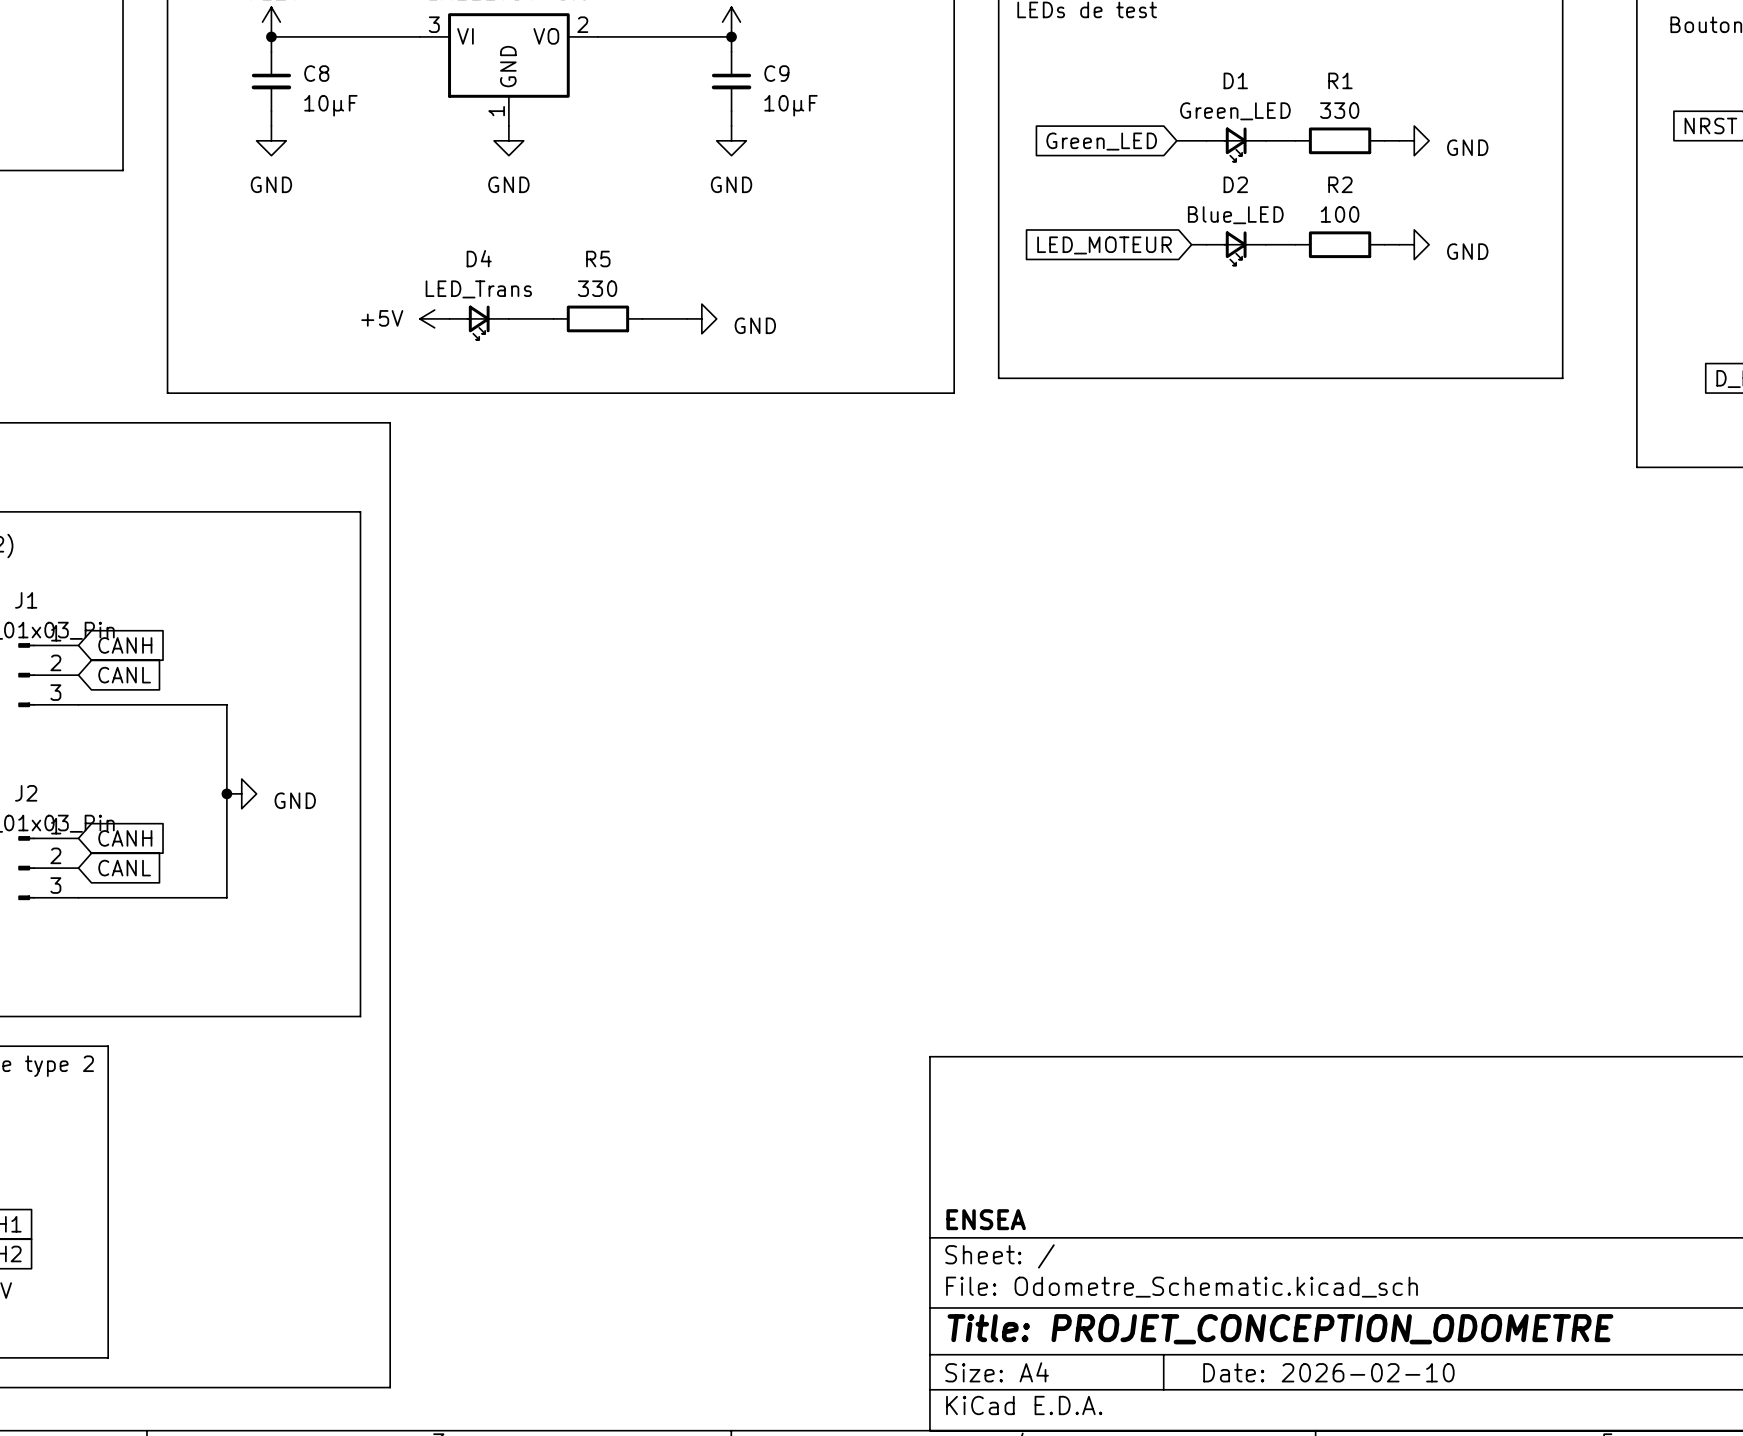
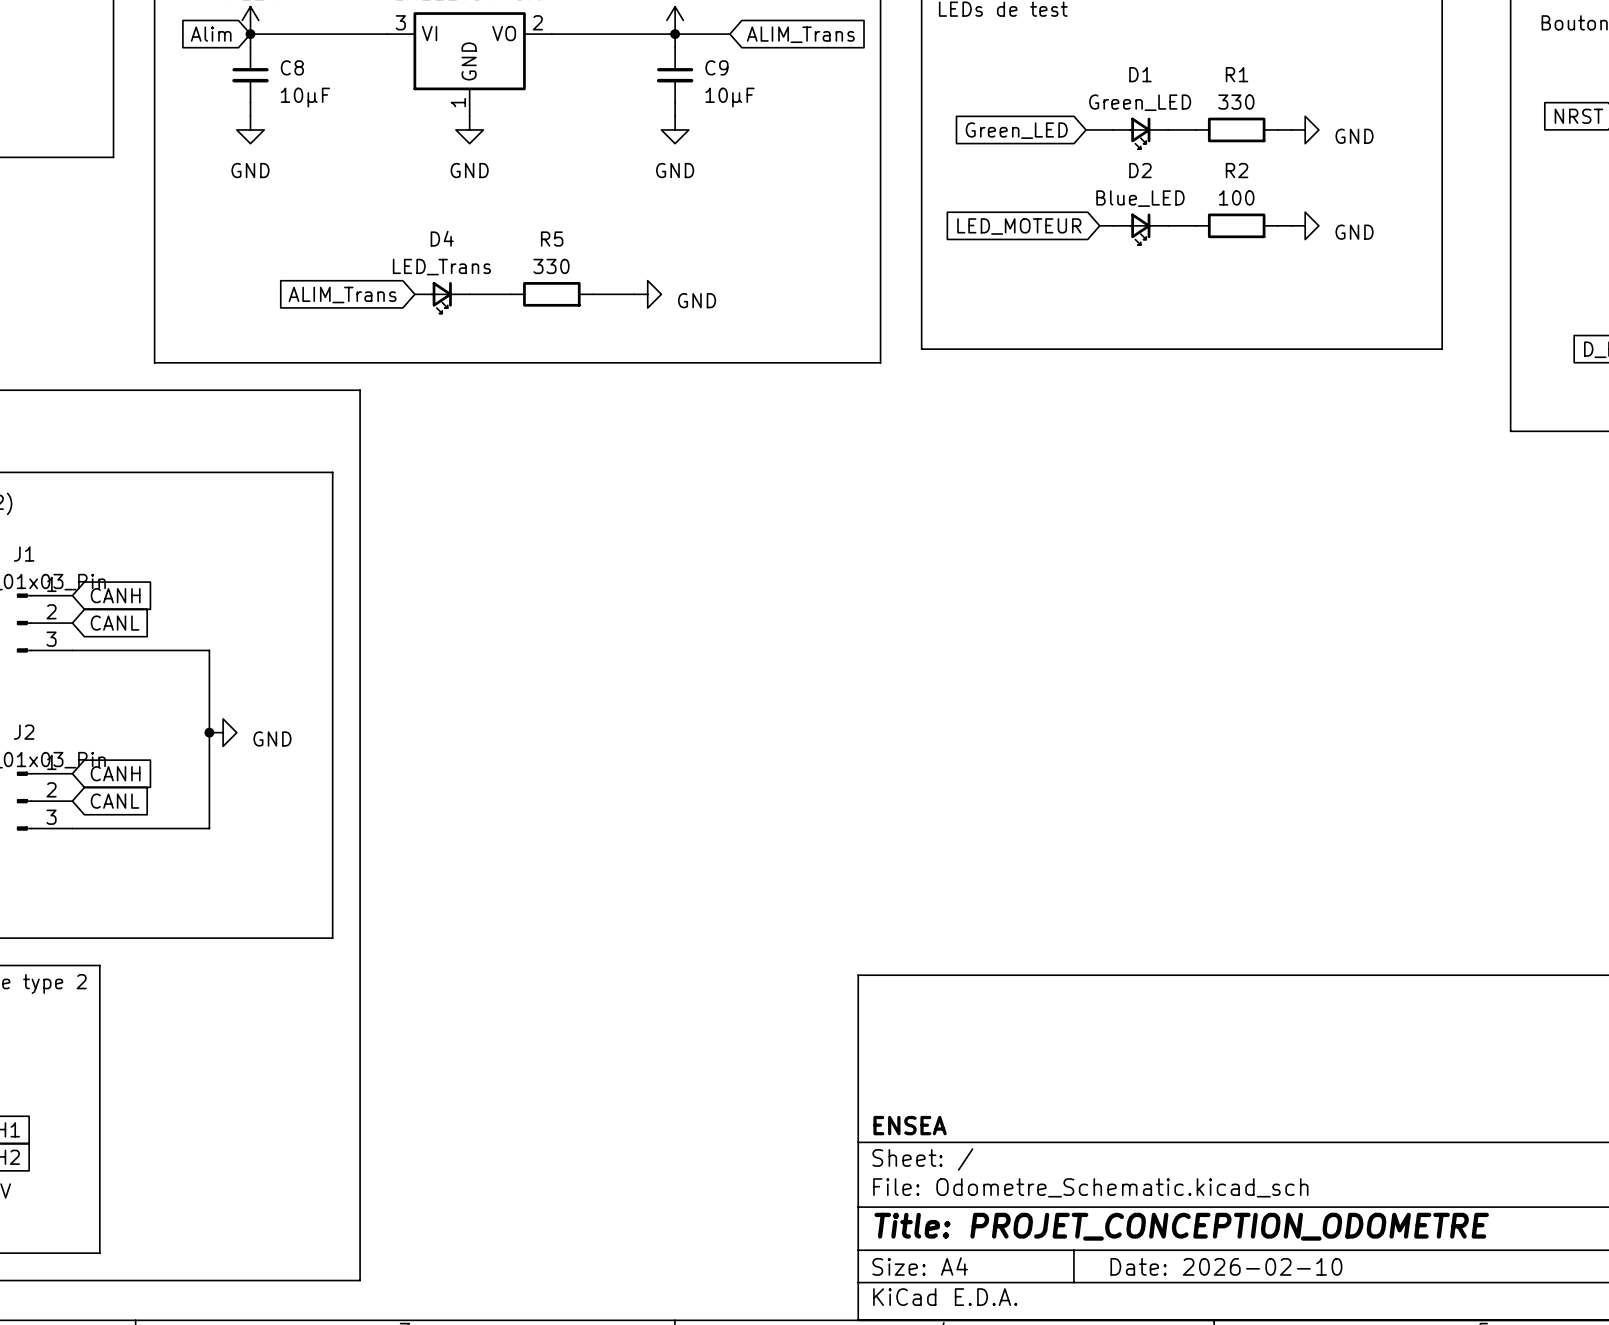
global label: none -> Alim (211, 34)
wire: none -> (675, 34) (729, 34)
global label: none -> ALIM_Trans (800, 34)
power symbol: +5V (434, 318) -> none
global label: none -> ALIM_Trans (342, 294)

